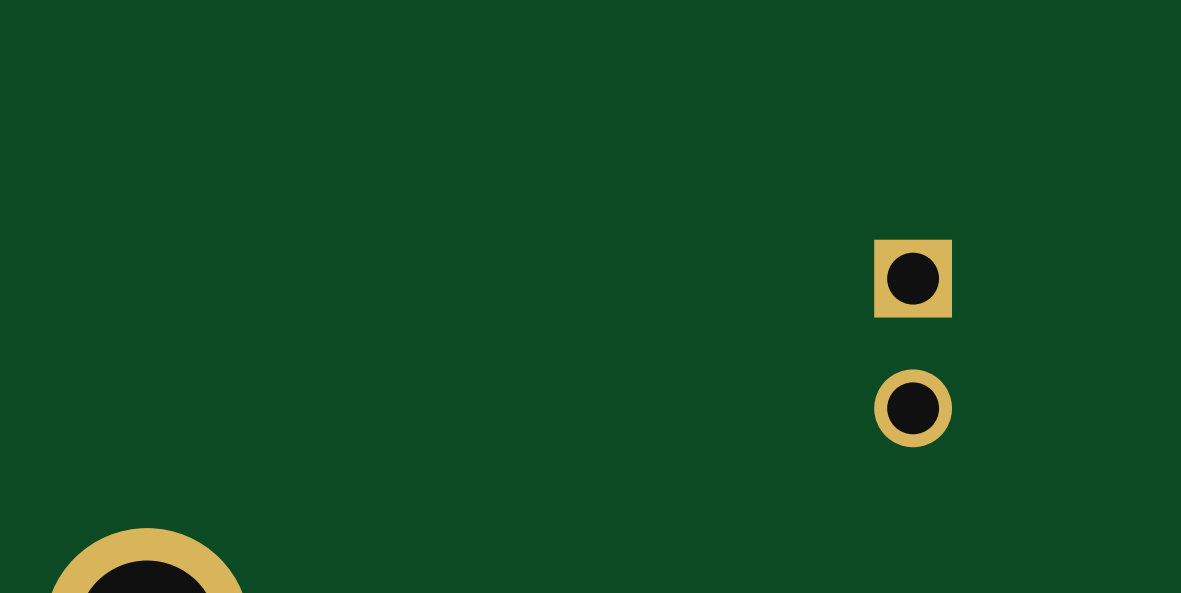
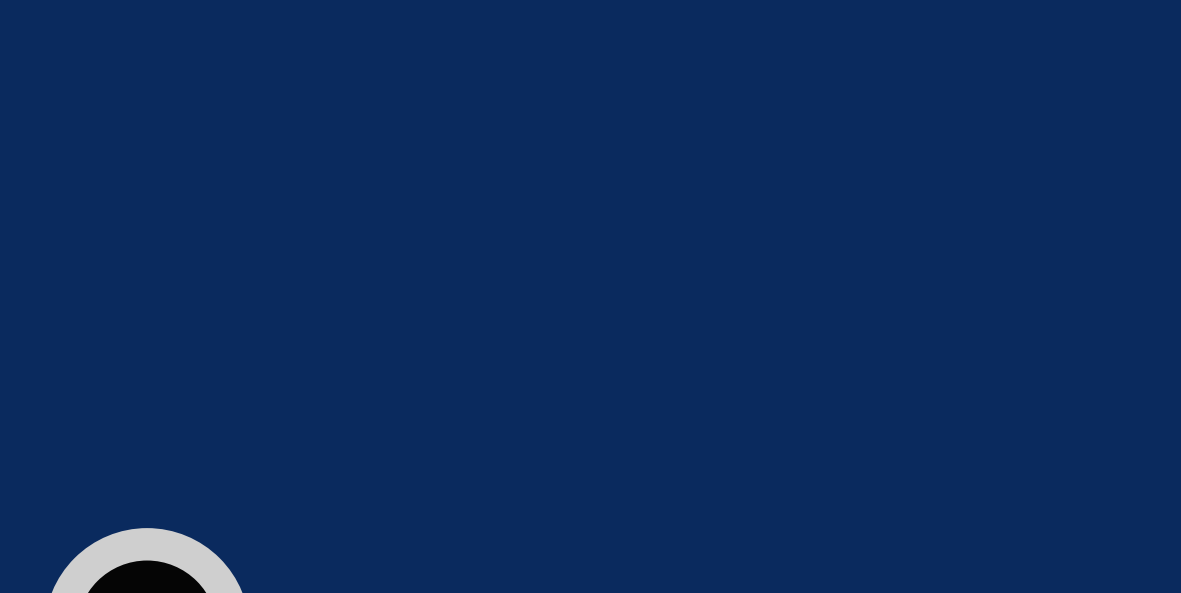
part: (913, 343) -> none

